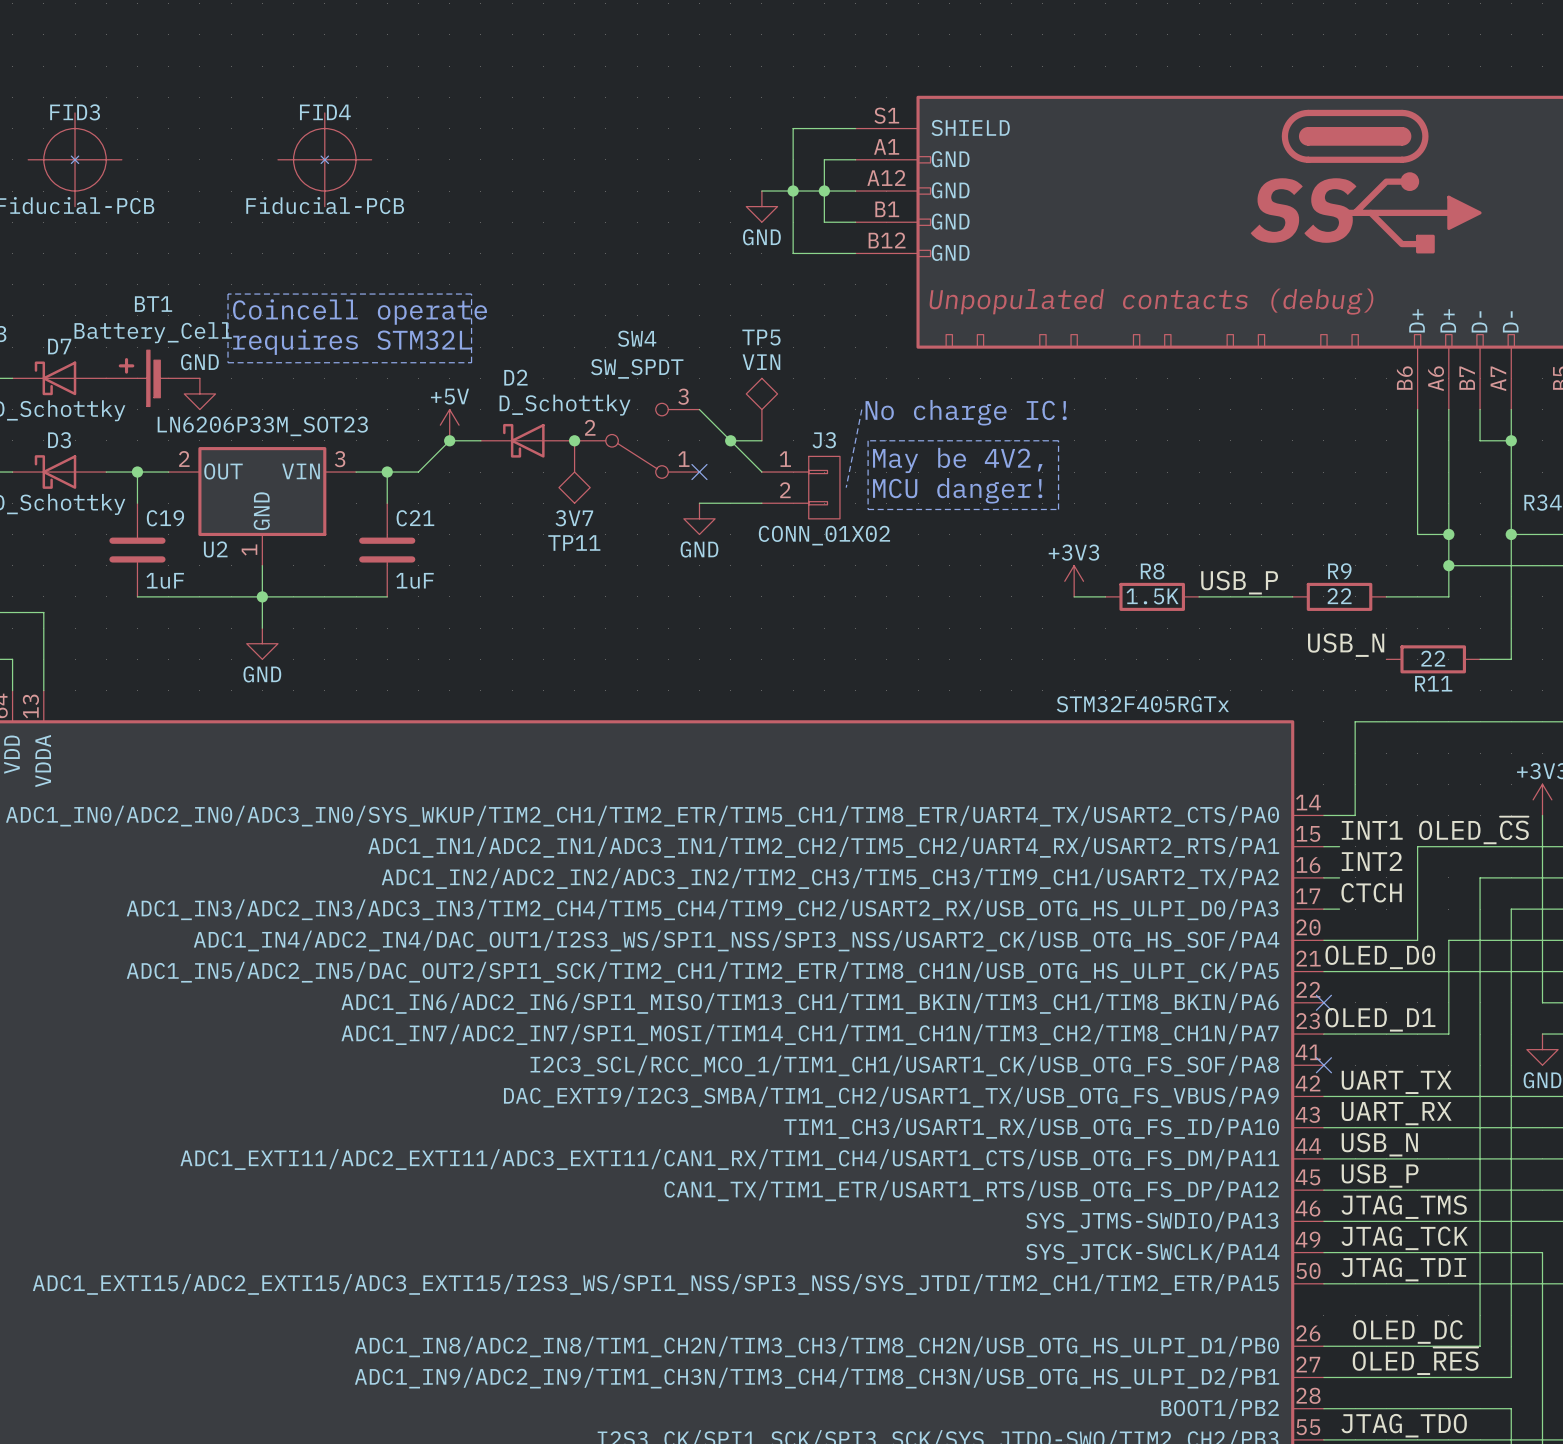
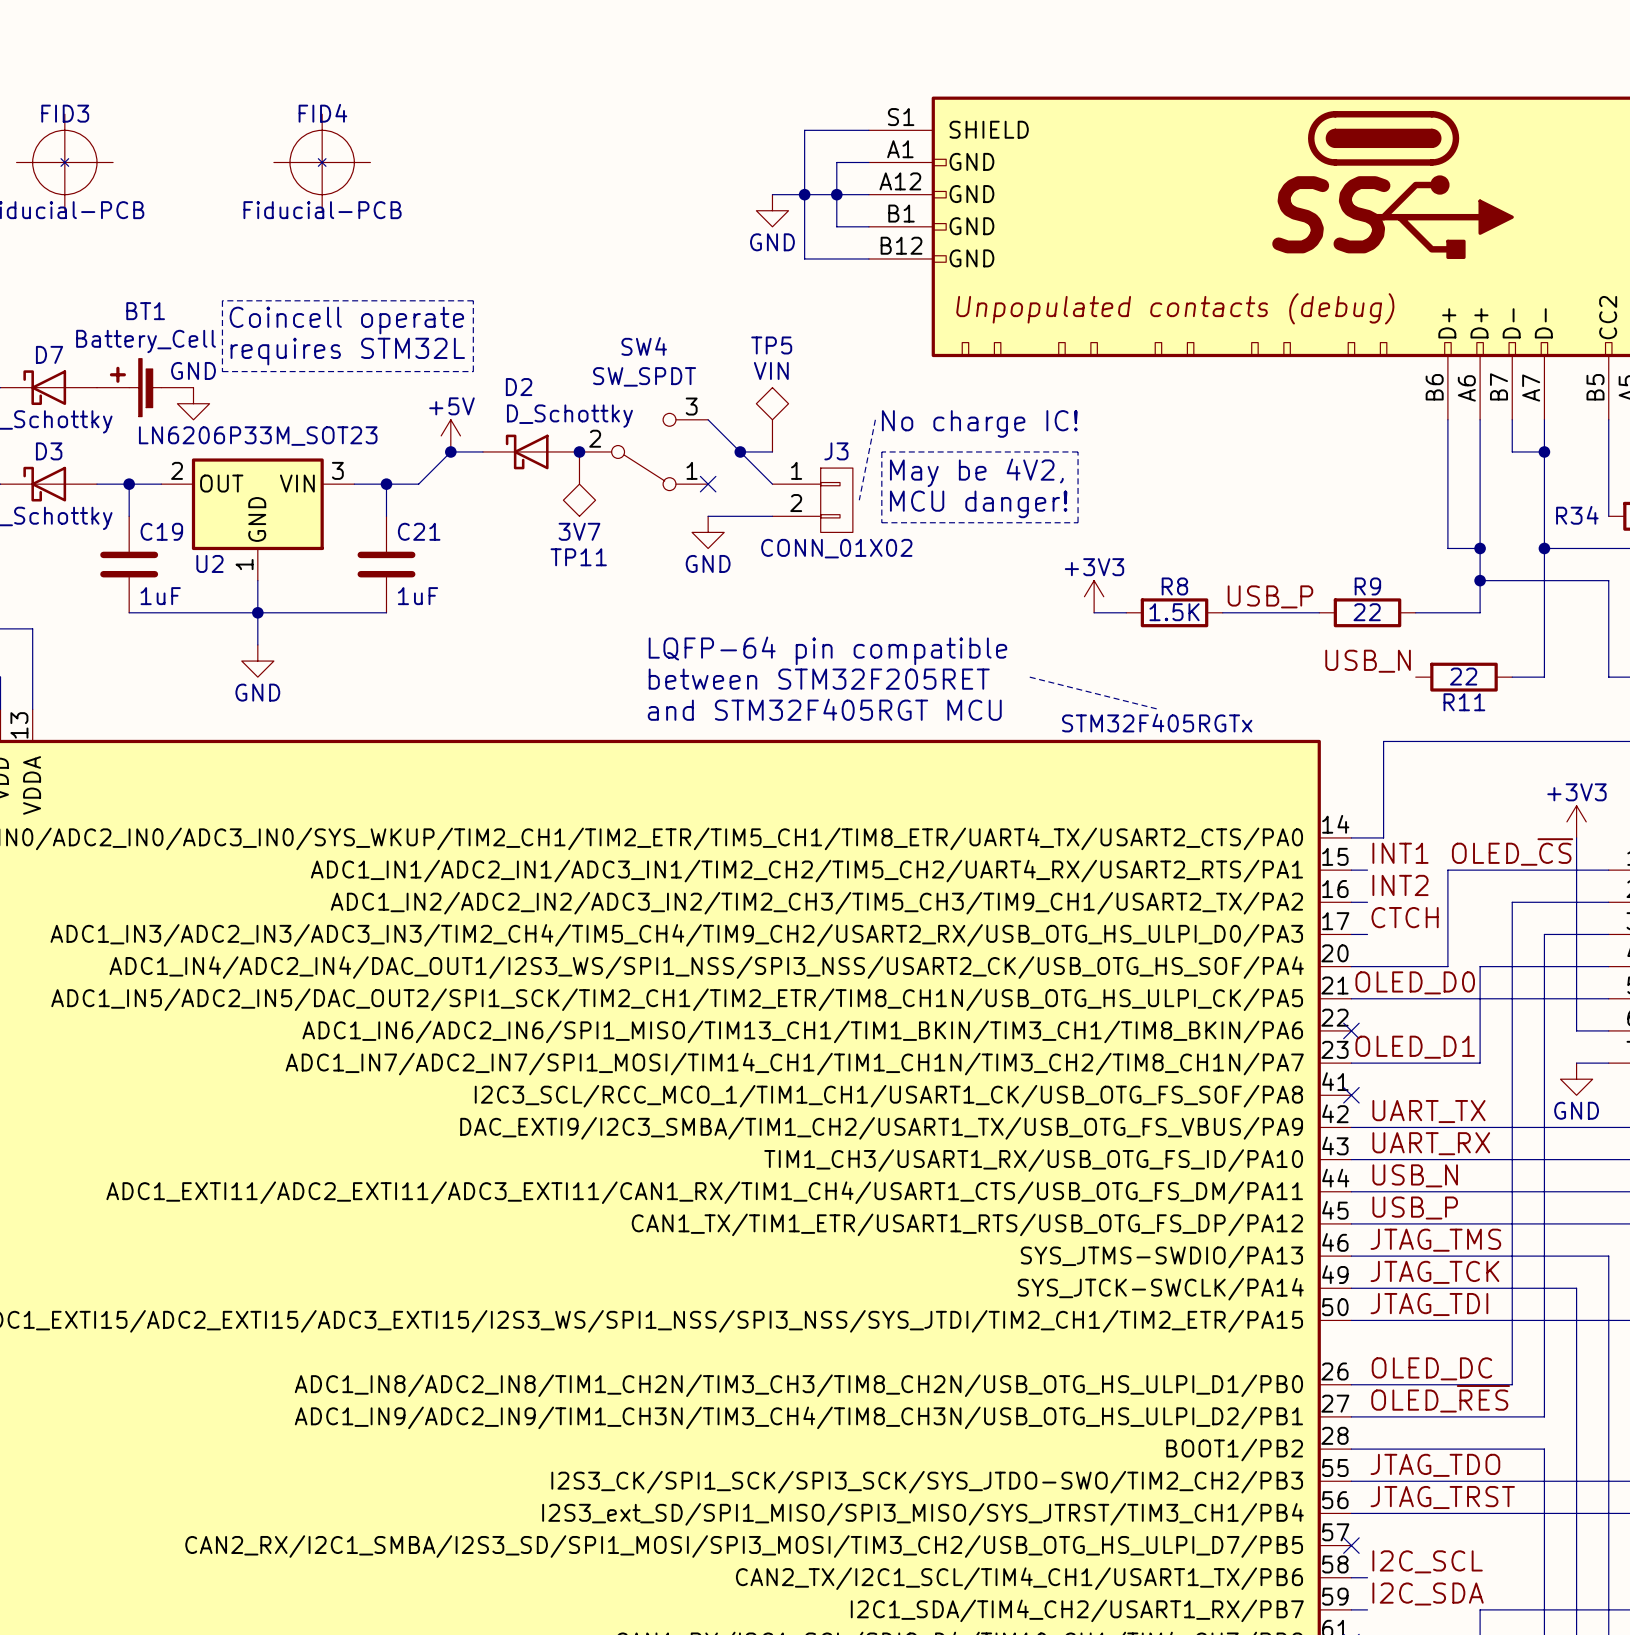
text: none -> LQFP-64 pin compatible (827, 650)
line: none -> (1029, 677) (1158, 709)
text: none -> between STM32F205RET (819, 679)
text: none -> and STM32F405RGT MCU (824, 709)

